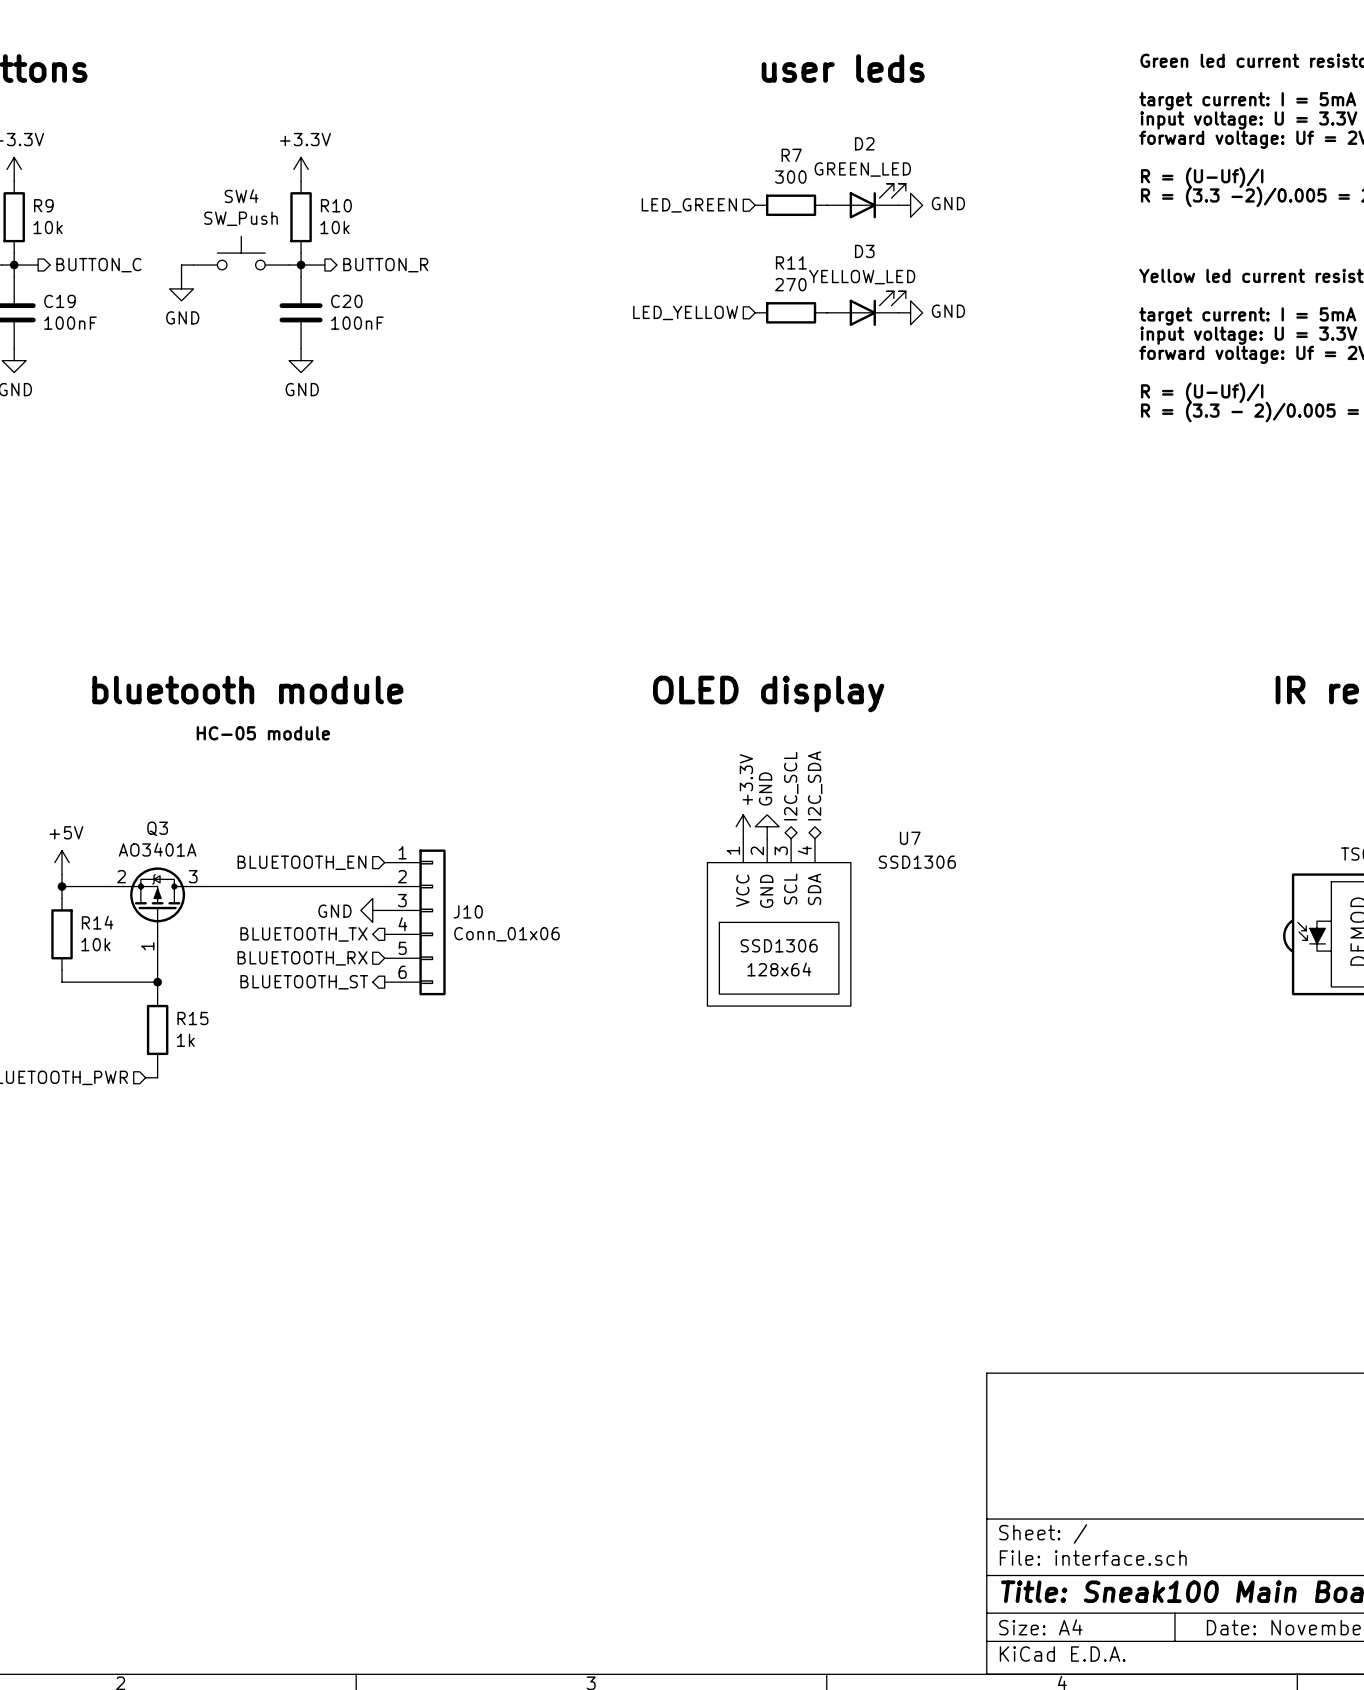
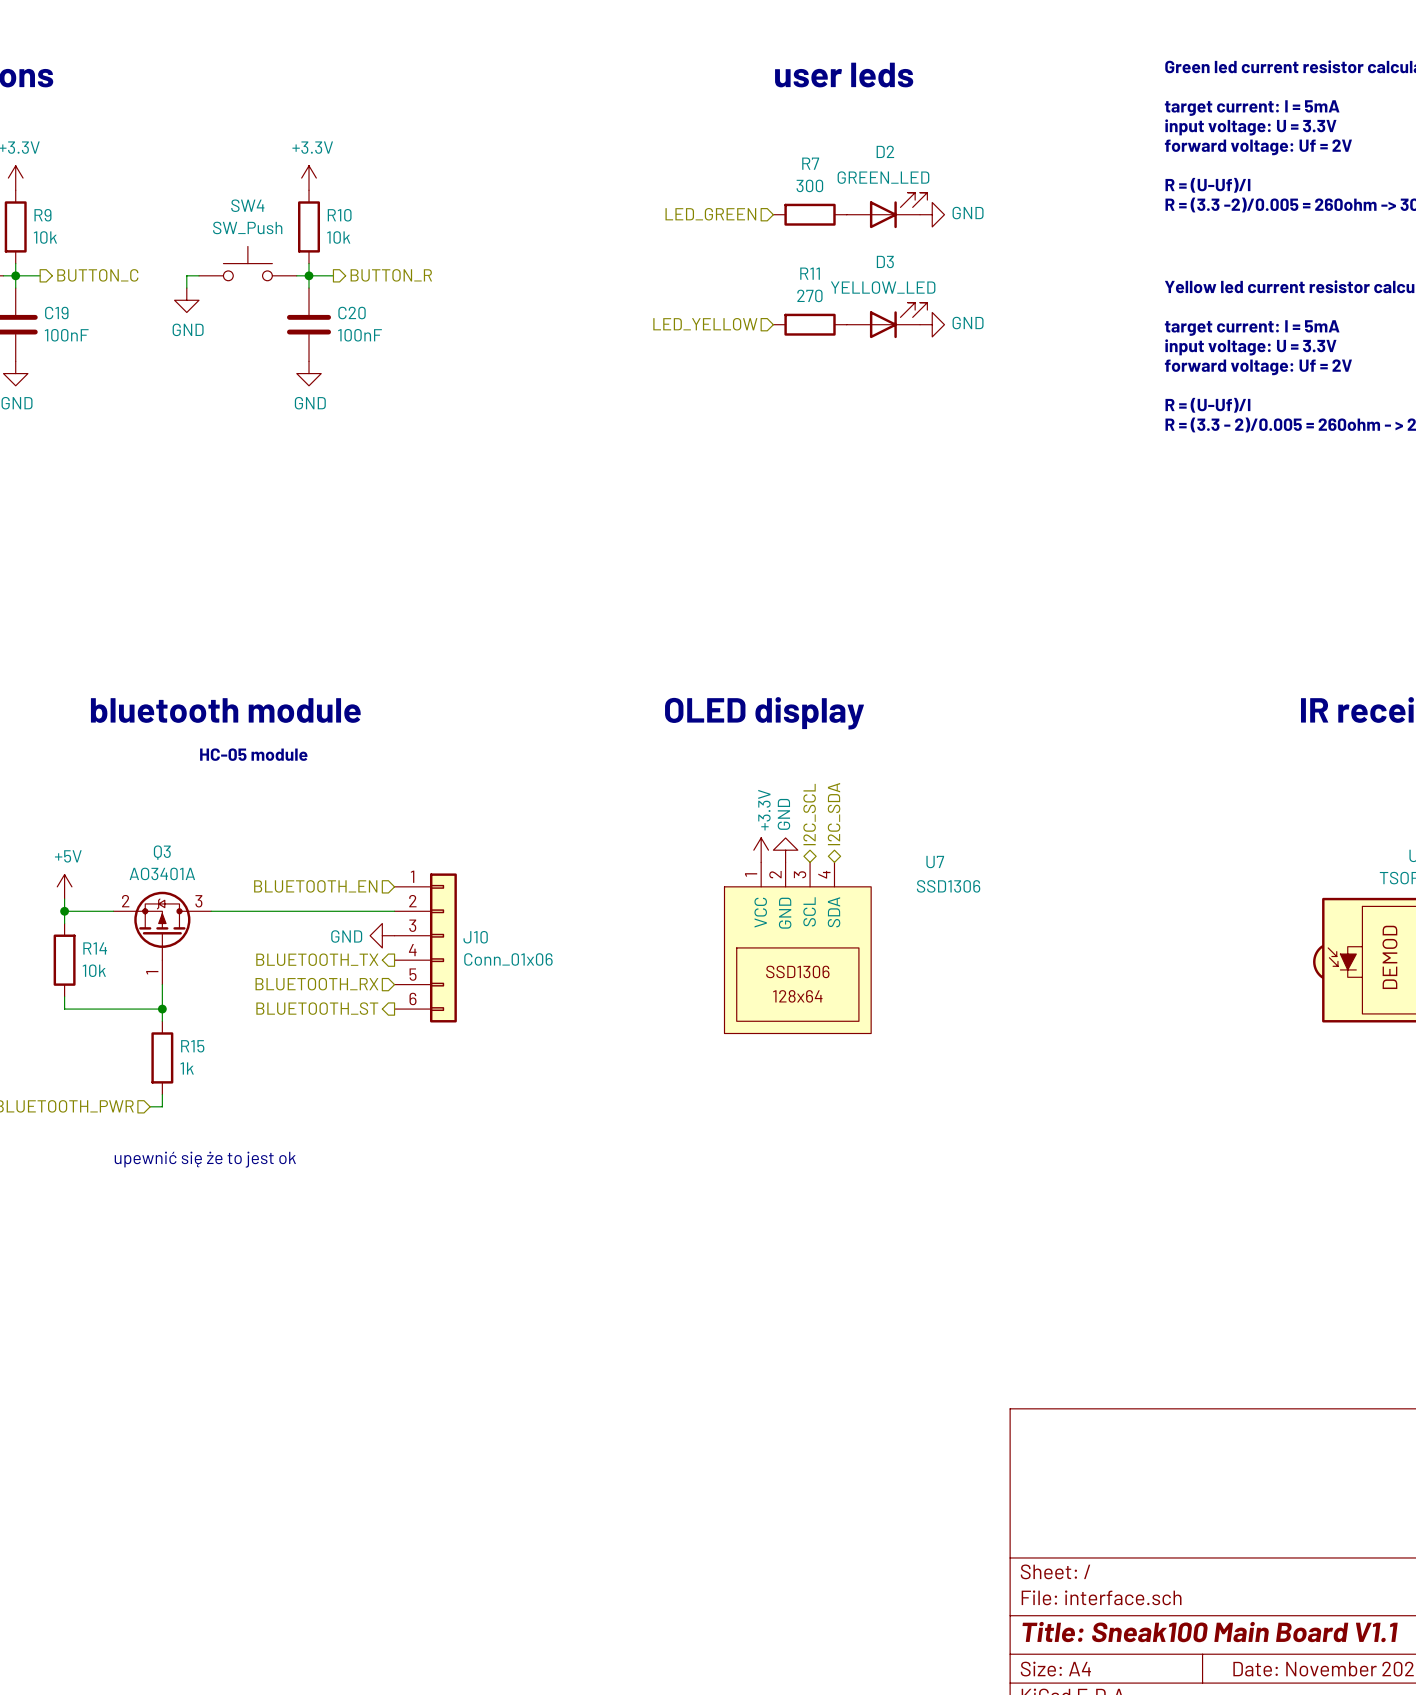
text: none -> upewnić się że to jest ok (205, 1159)

